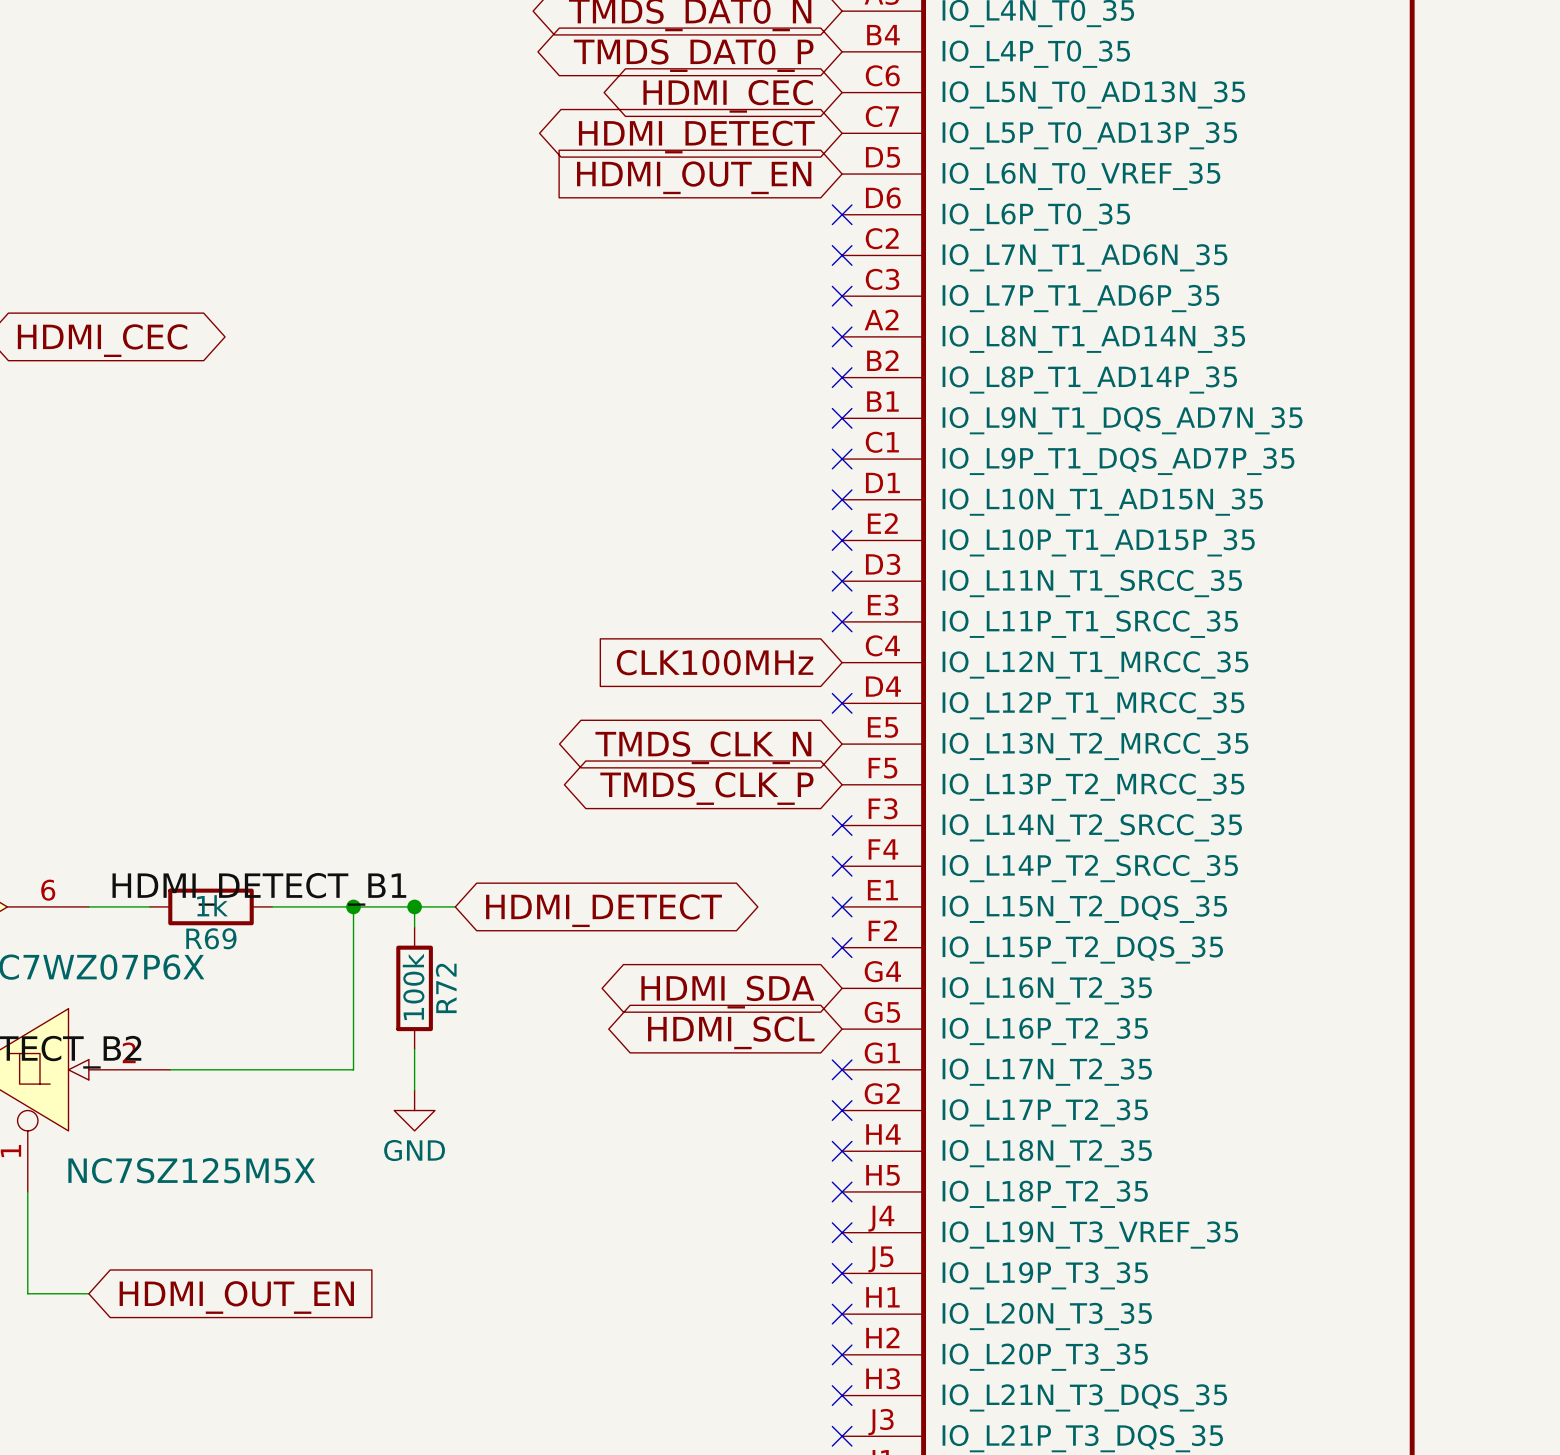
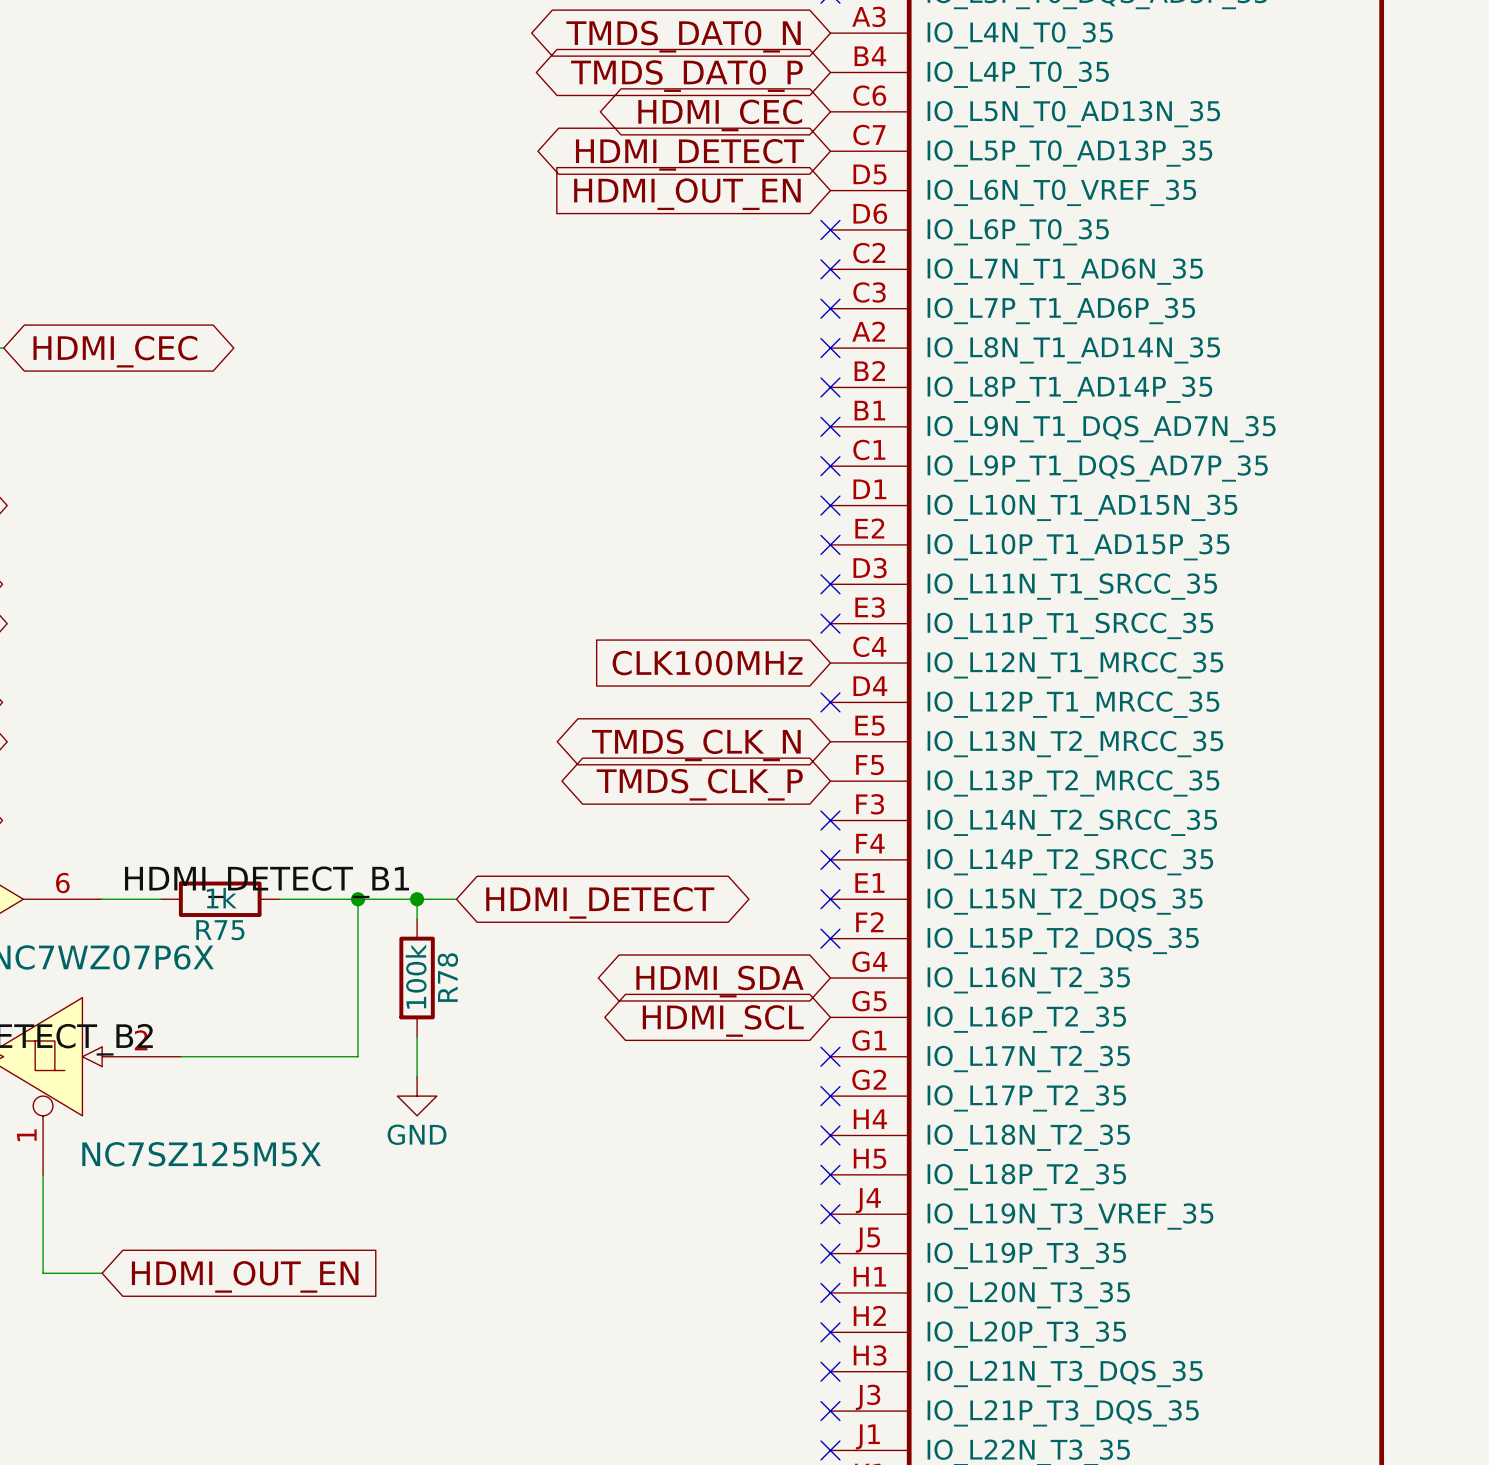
R69 name: R69 (211, 938) -> R75 (220, 930)
R72 name: R72 (446, 988) -> R78 (447, 977)

